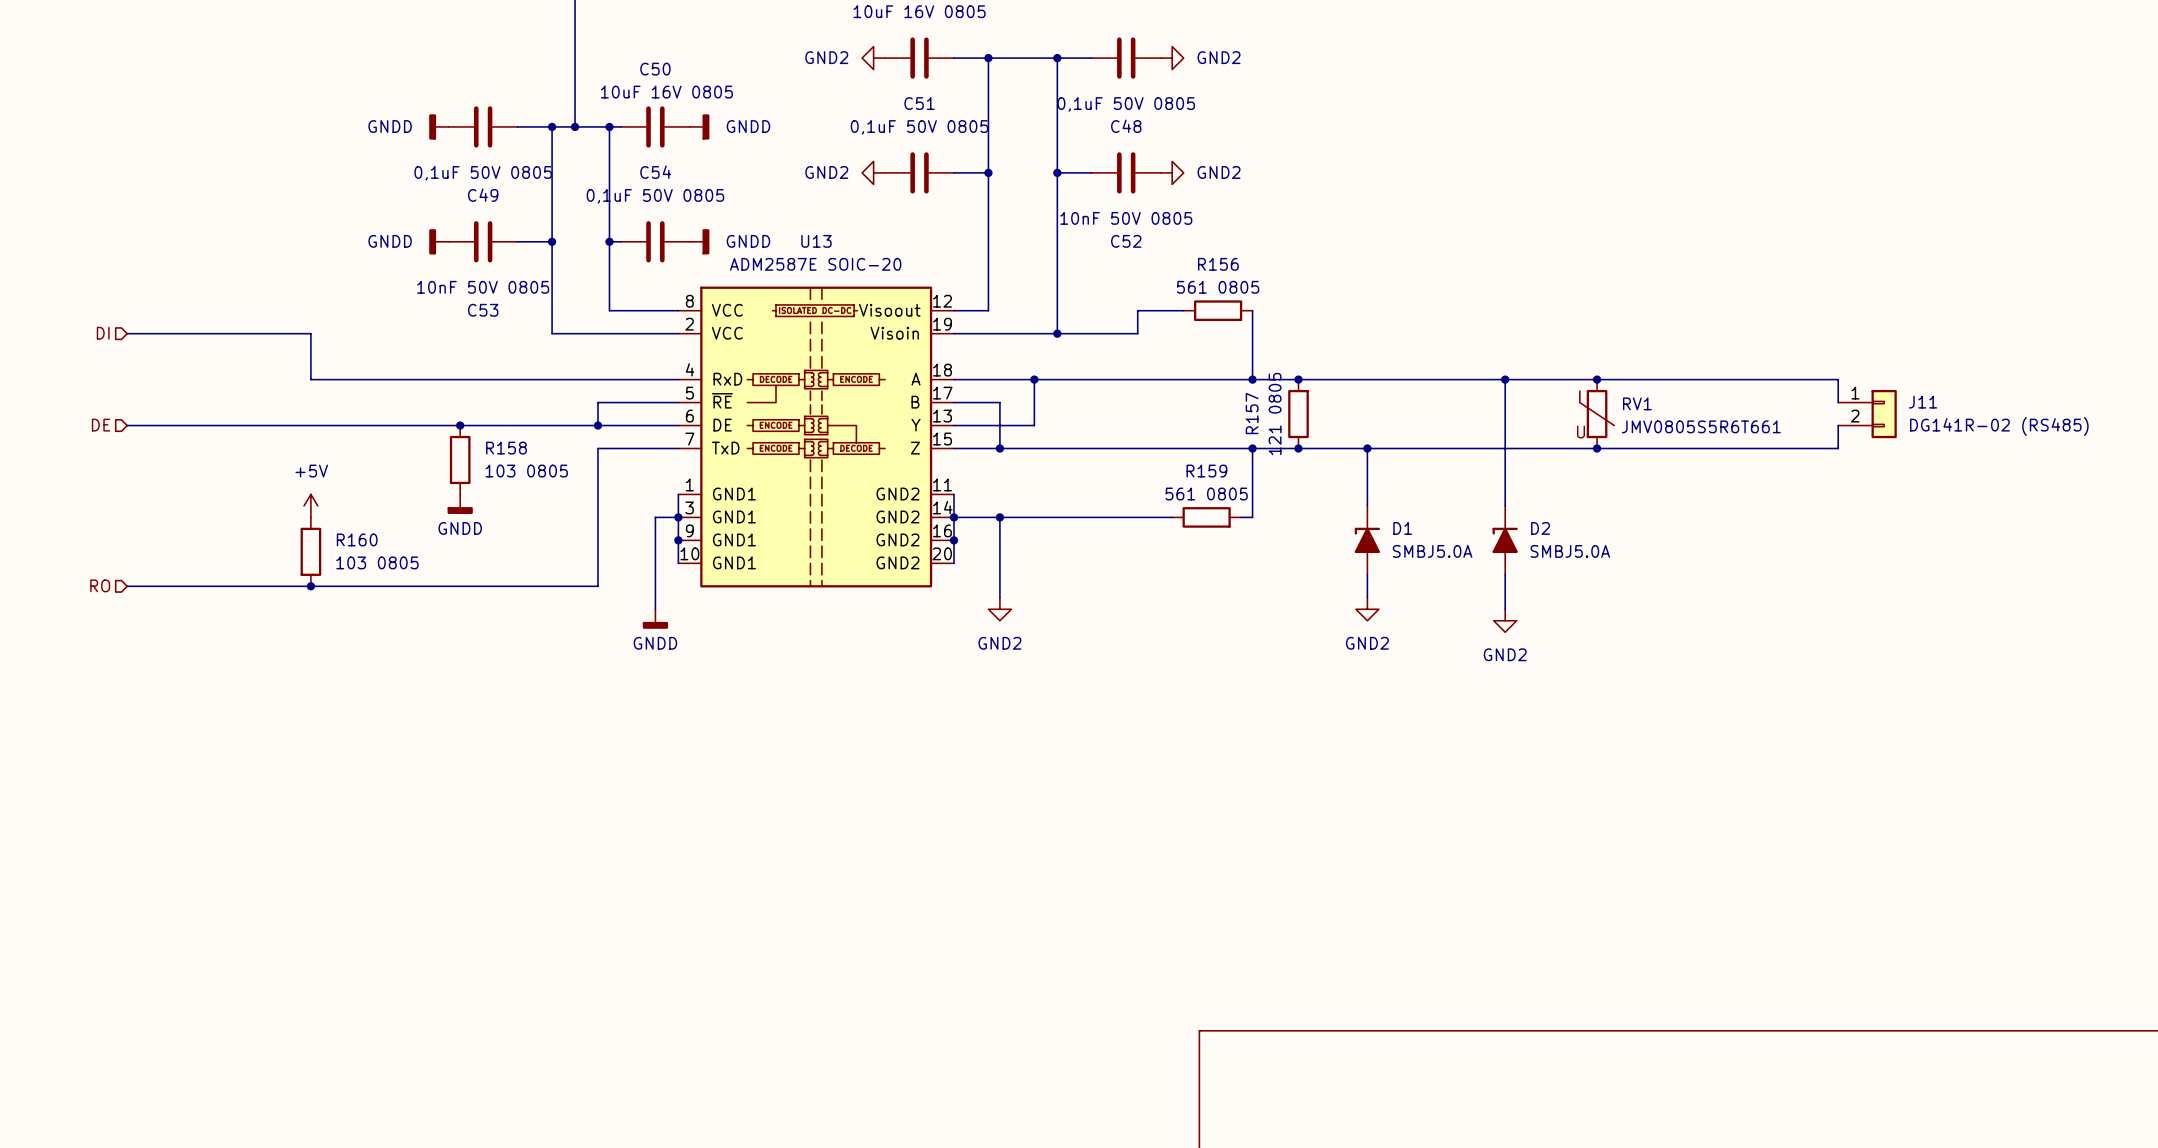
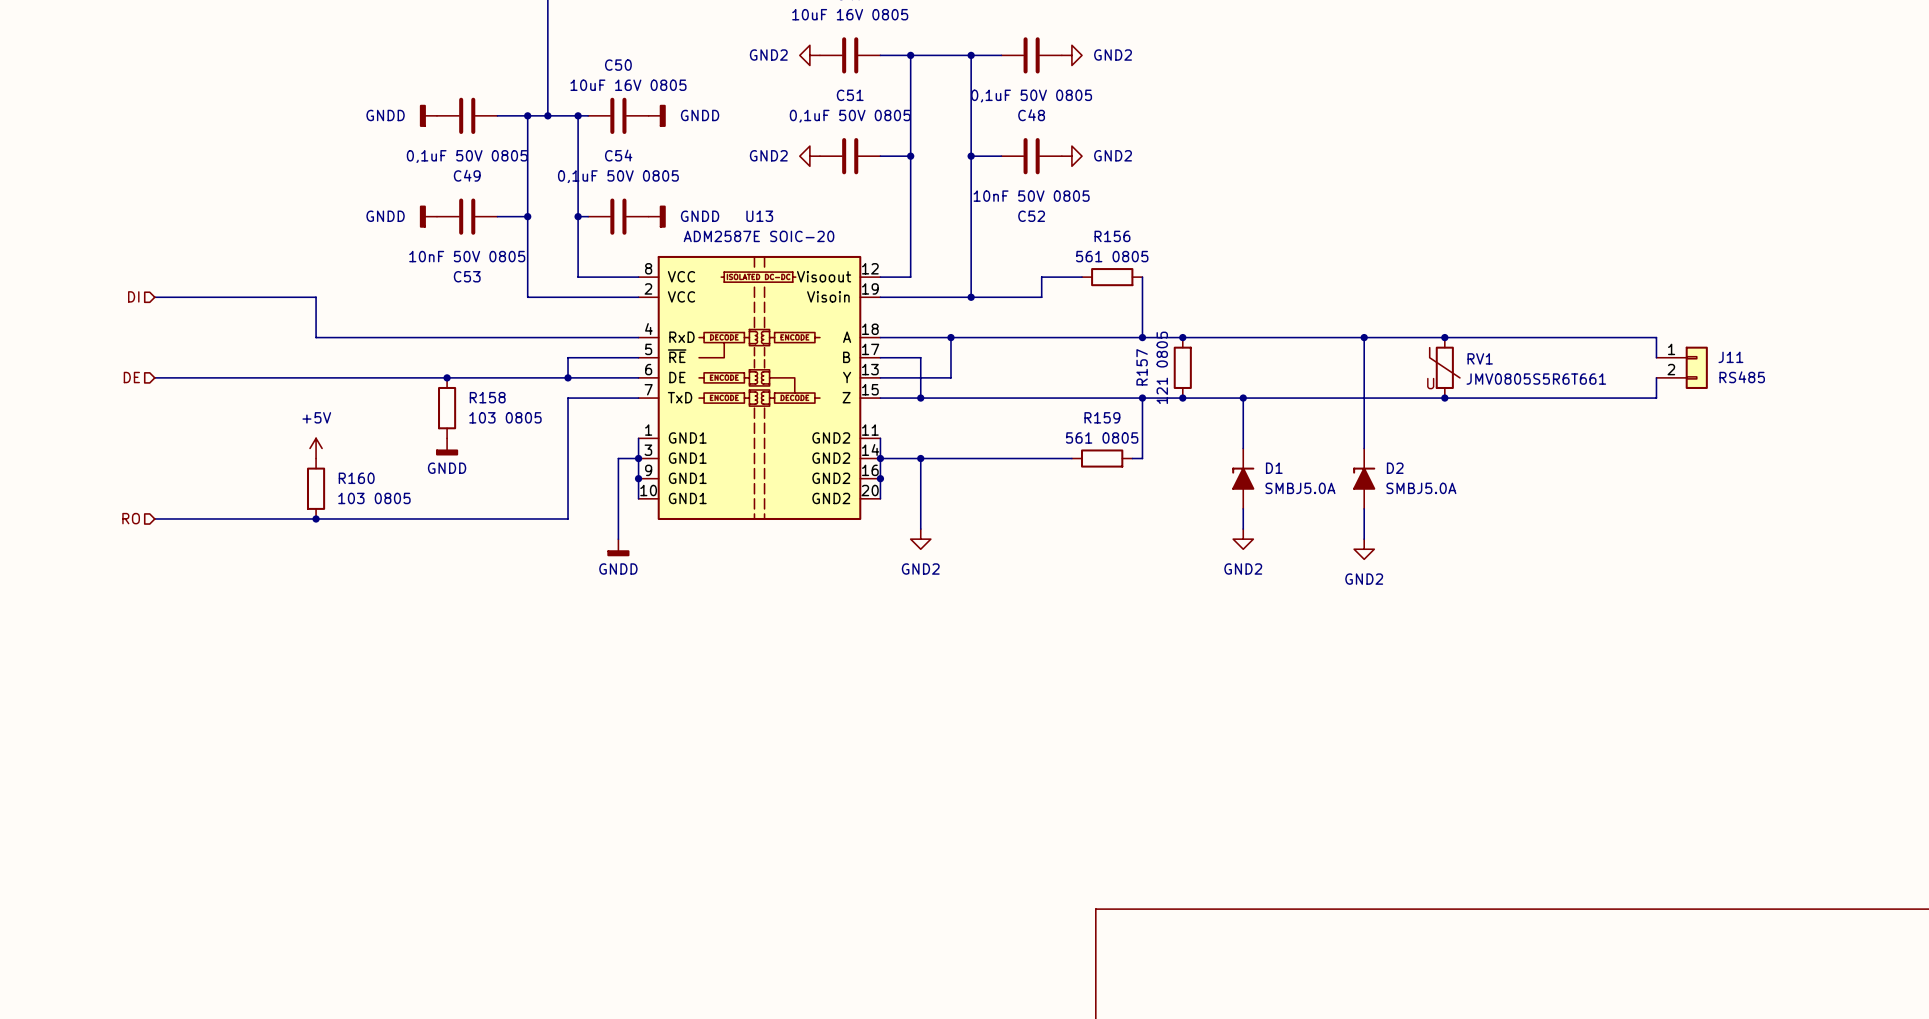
J11 value: DG141R-02 (RS485) (1999, 426) -> RS485 (1742, 377)

